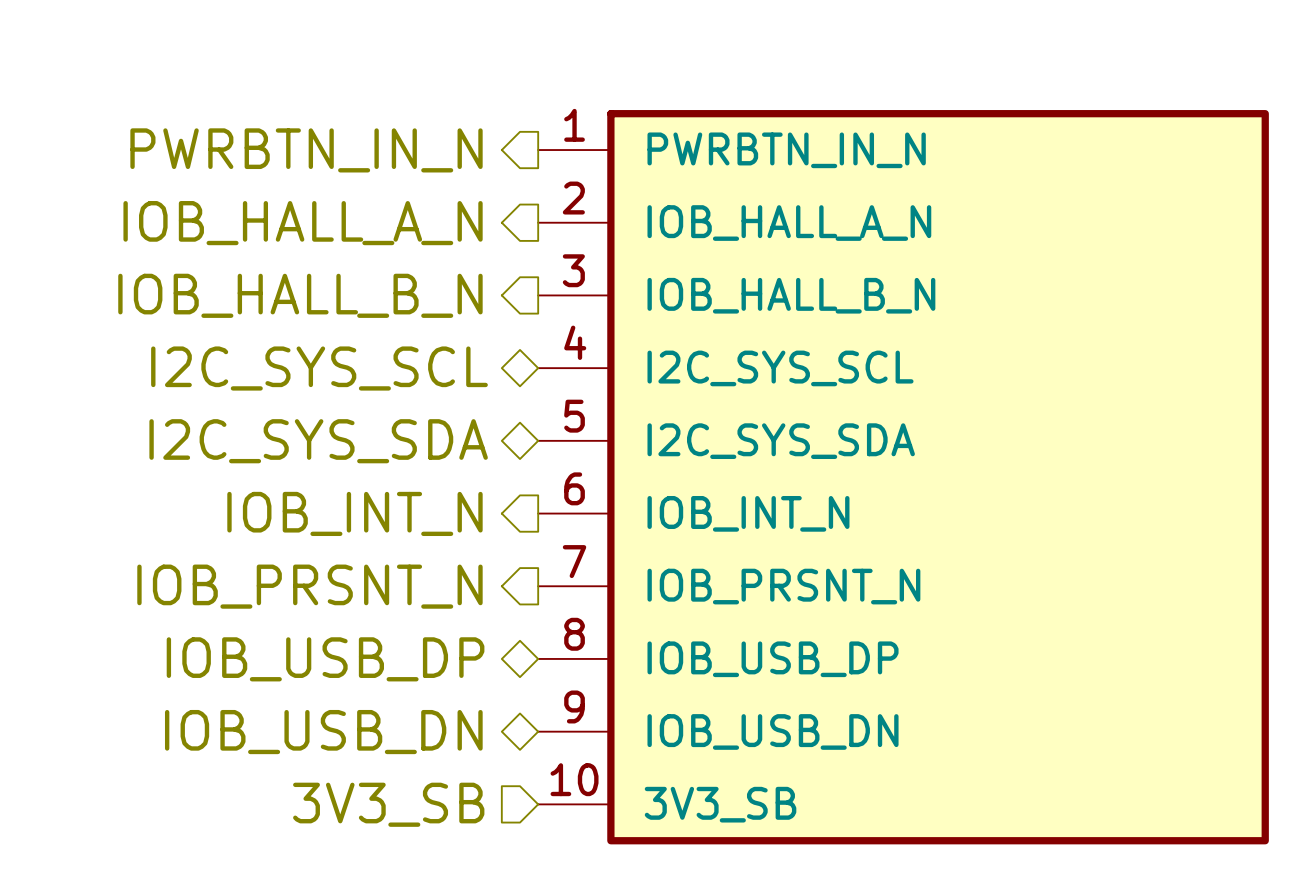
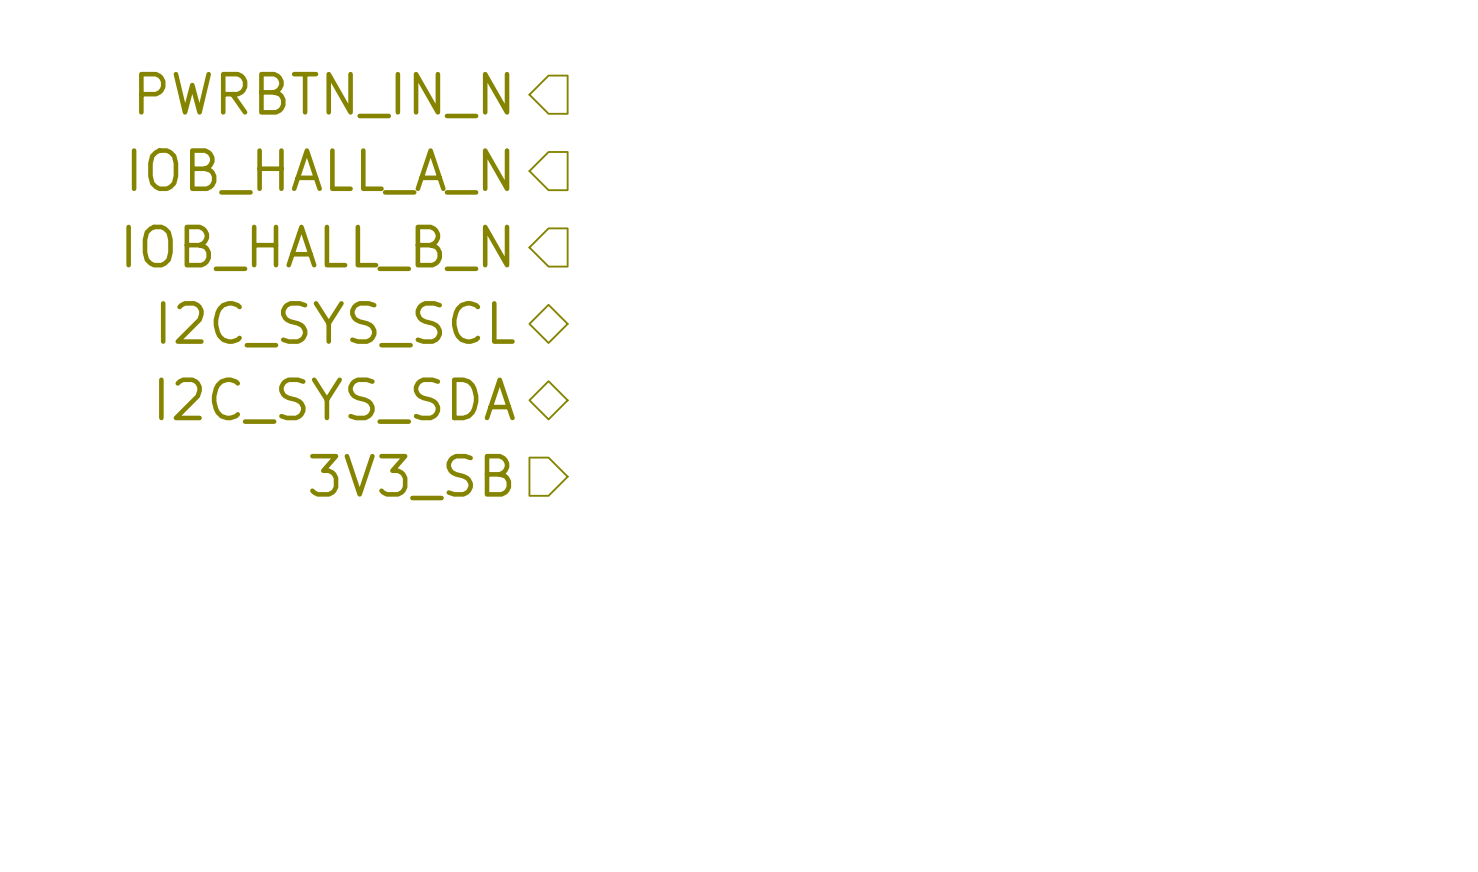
power symbol: (903, 477) -> none
hierarchical label shape: output (354, 513) -> input (410, 477)
hierarchical label: IOB_INT_N (354, 513) -> 3V3_SB (410, 477)
hierarchical label: IOB_PRSNT_N (309, 586) -> none
hierarchical label: IOB_USB_DP (325, 659) -> none
hierarchical label: IOB_USB_DN (323, 732) -> none
hierarchical label: 3V3_SB (388, 804) -> none

